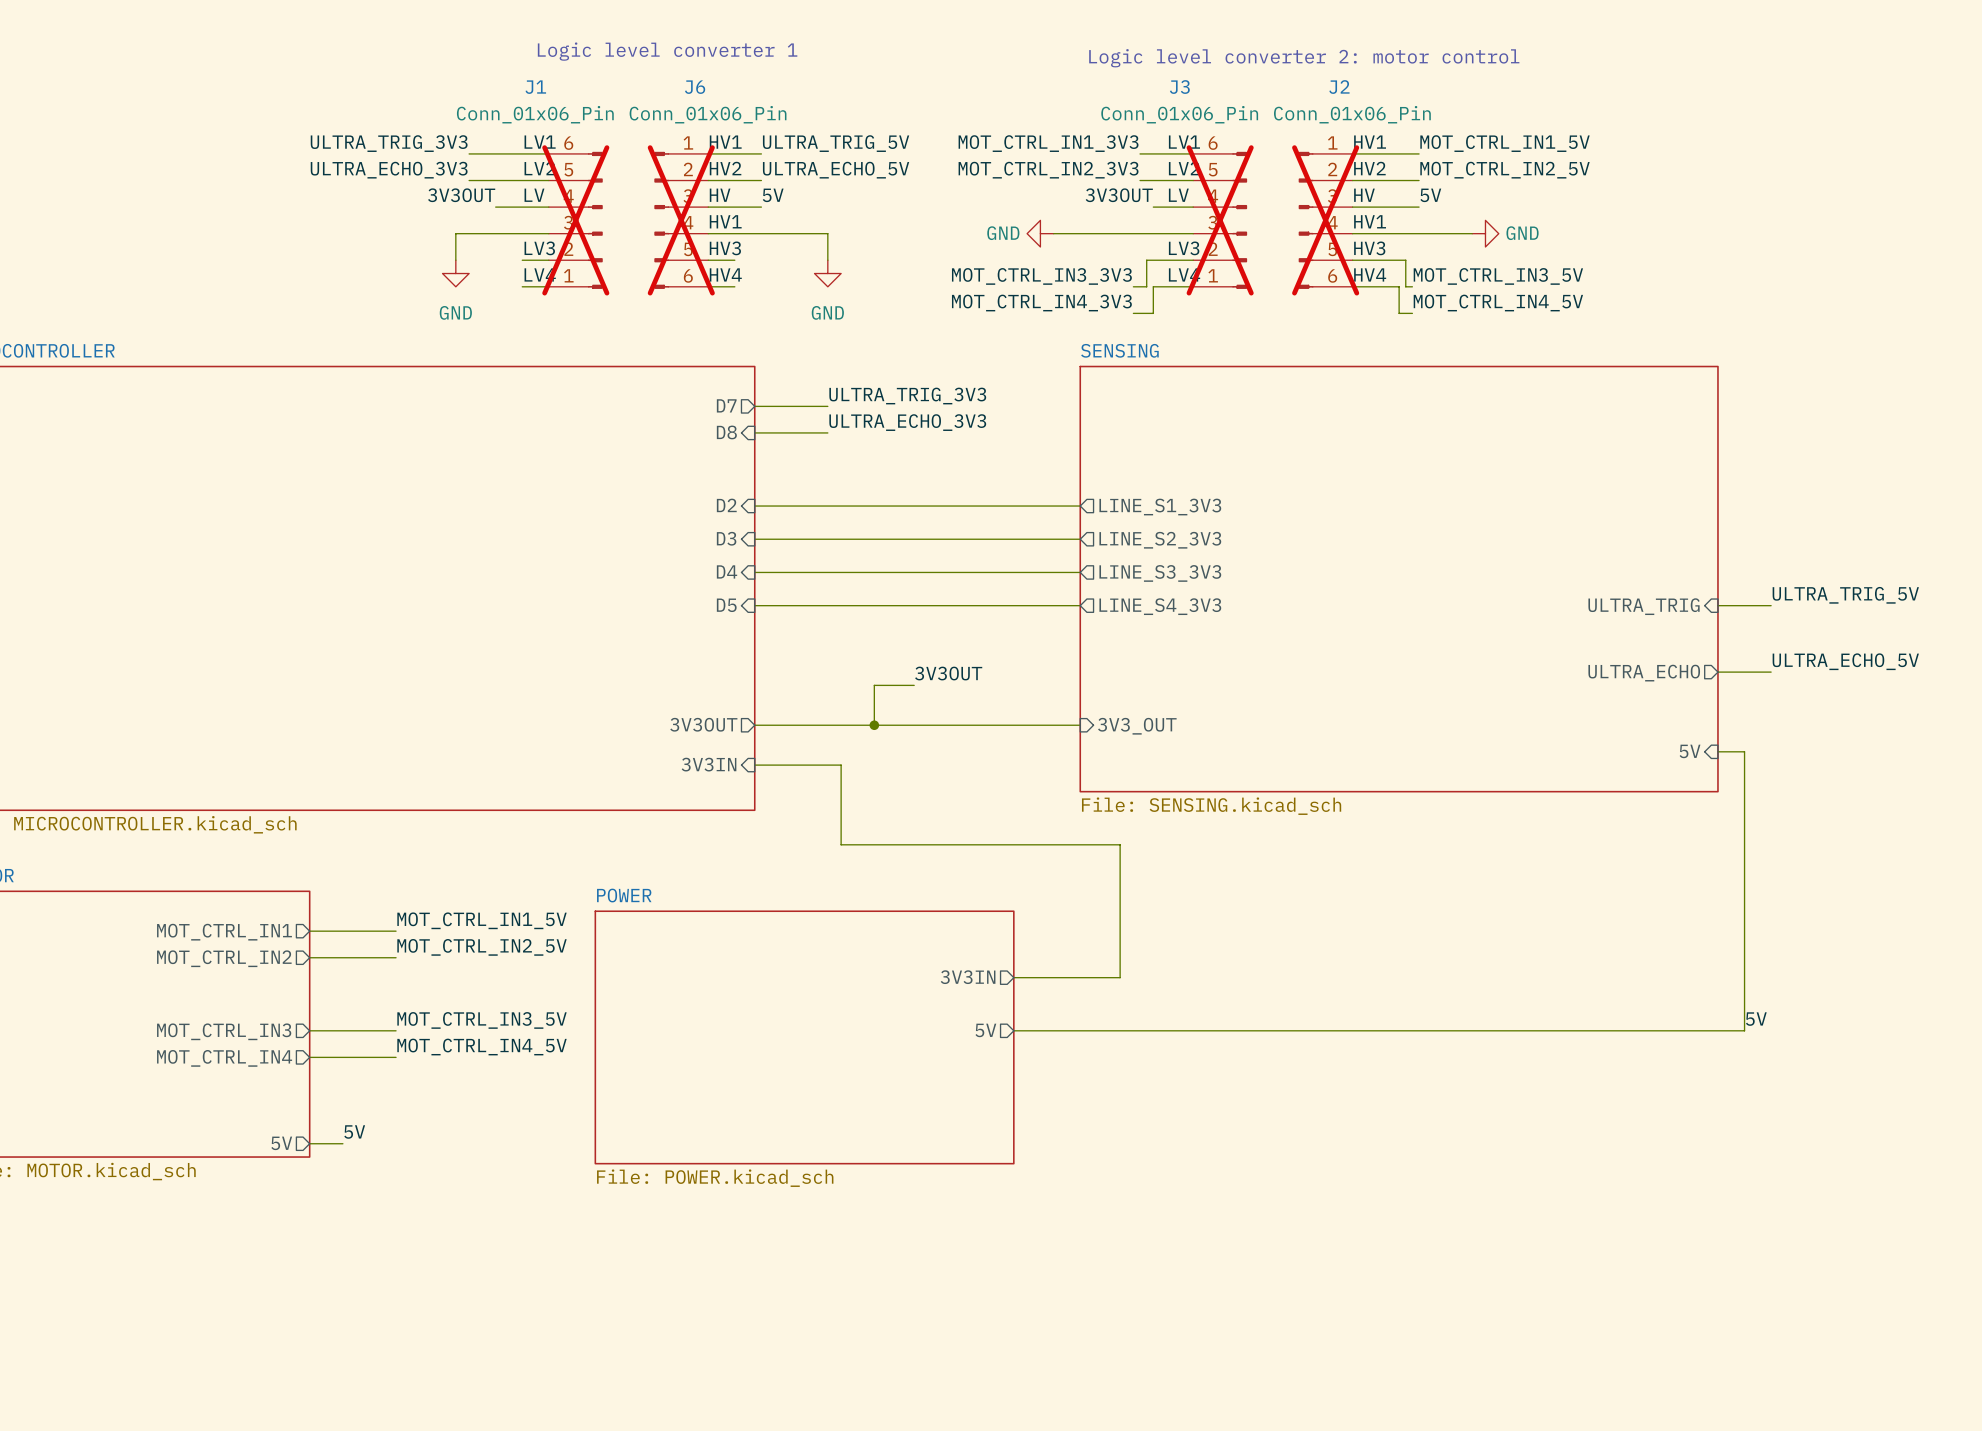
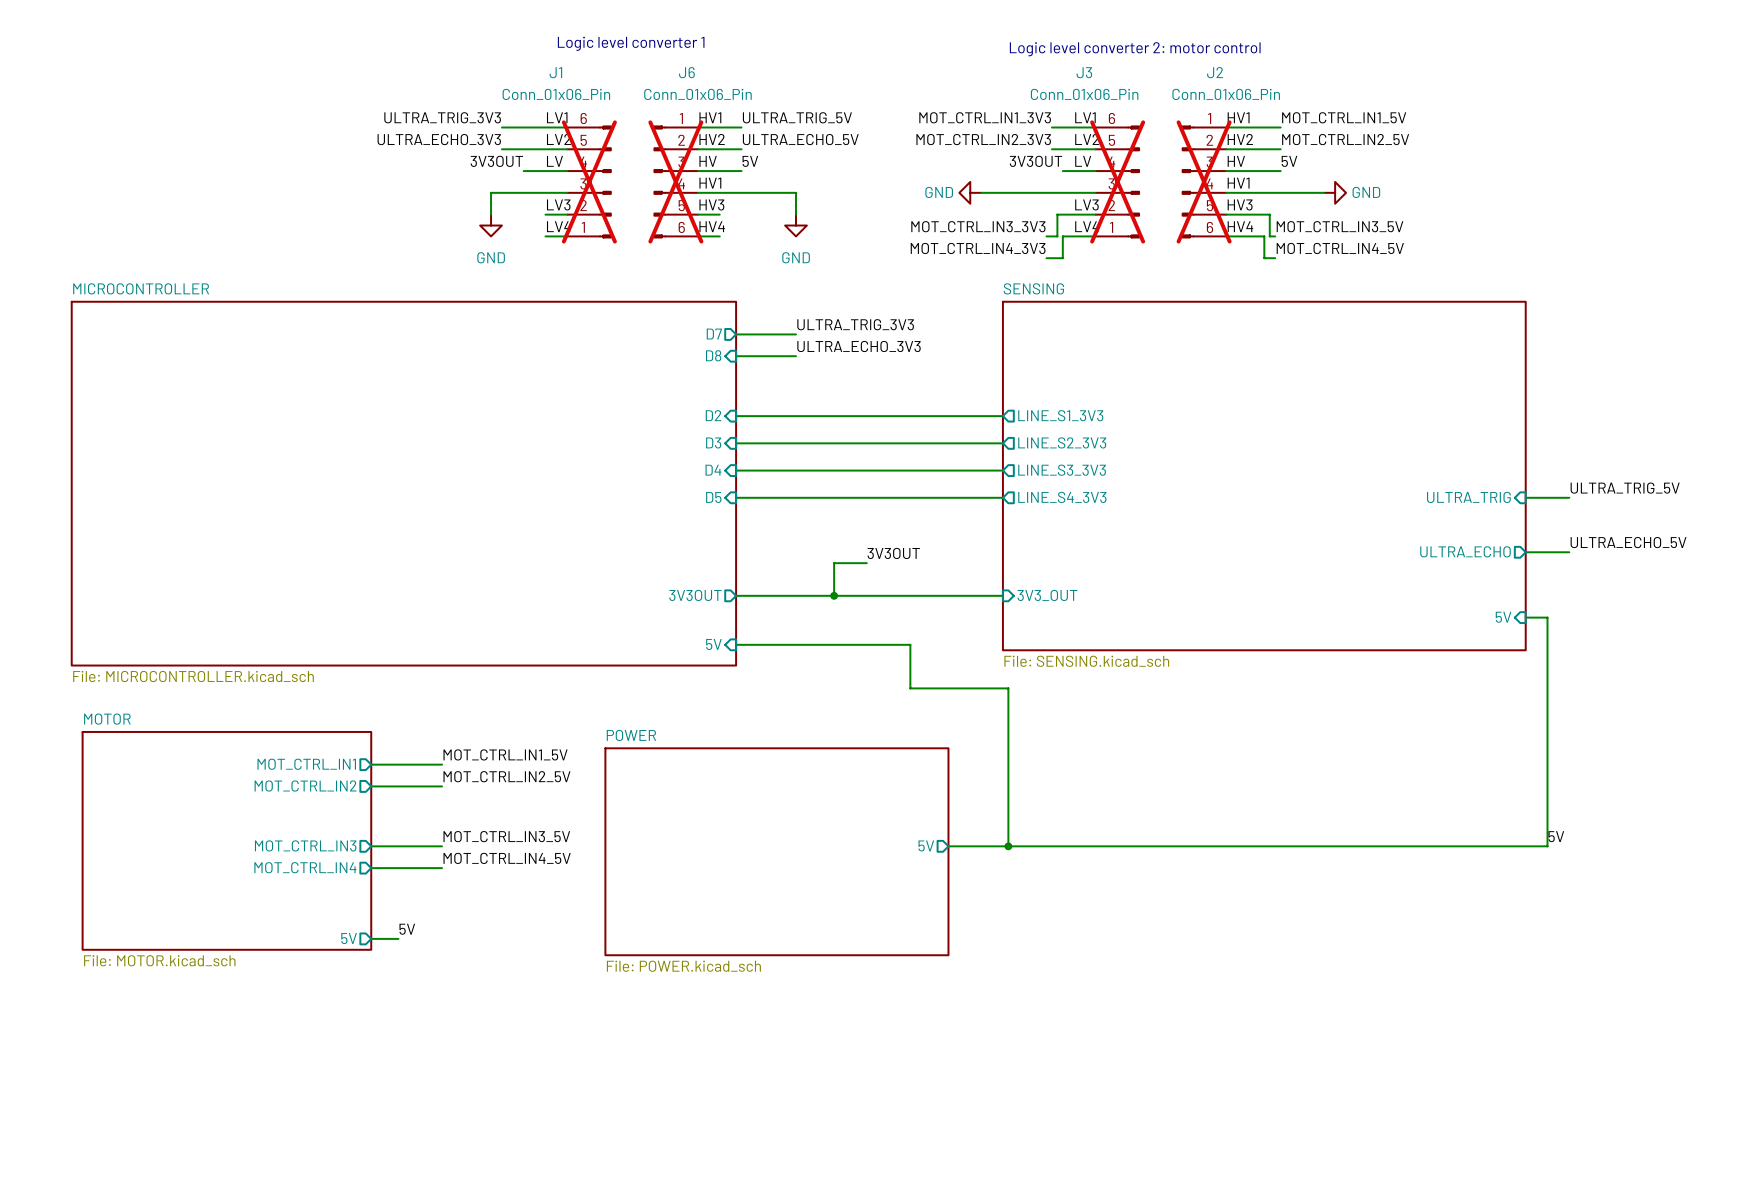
sheet pin: 3V3IN (709, 764) -> none
wire: (754, 765) (841, 765) (841, 844) (1120, 844) (1120, 977) (1013, 977) -> none
sheet pin: none -> 5V (713, 644)
wire: none -> (736, 644) (910, 644) (910, 688) (1008, 688) (1008, 846)
sheet pin: 3V3IN (968, 977) -> none
junction: none -> (1008, 846)

